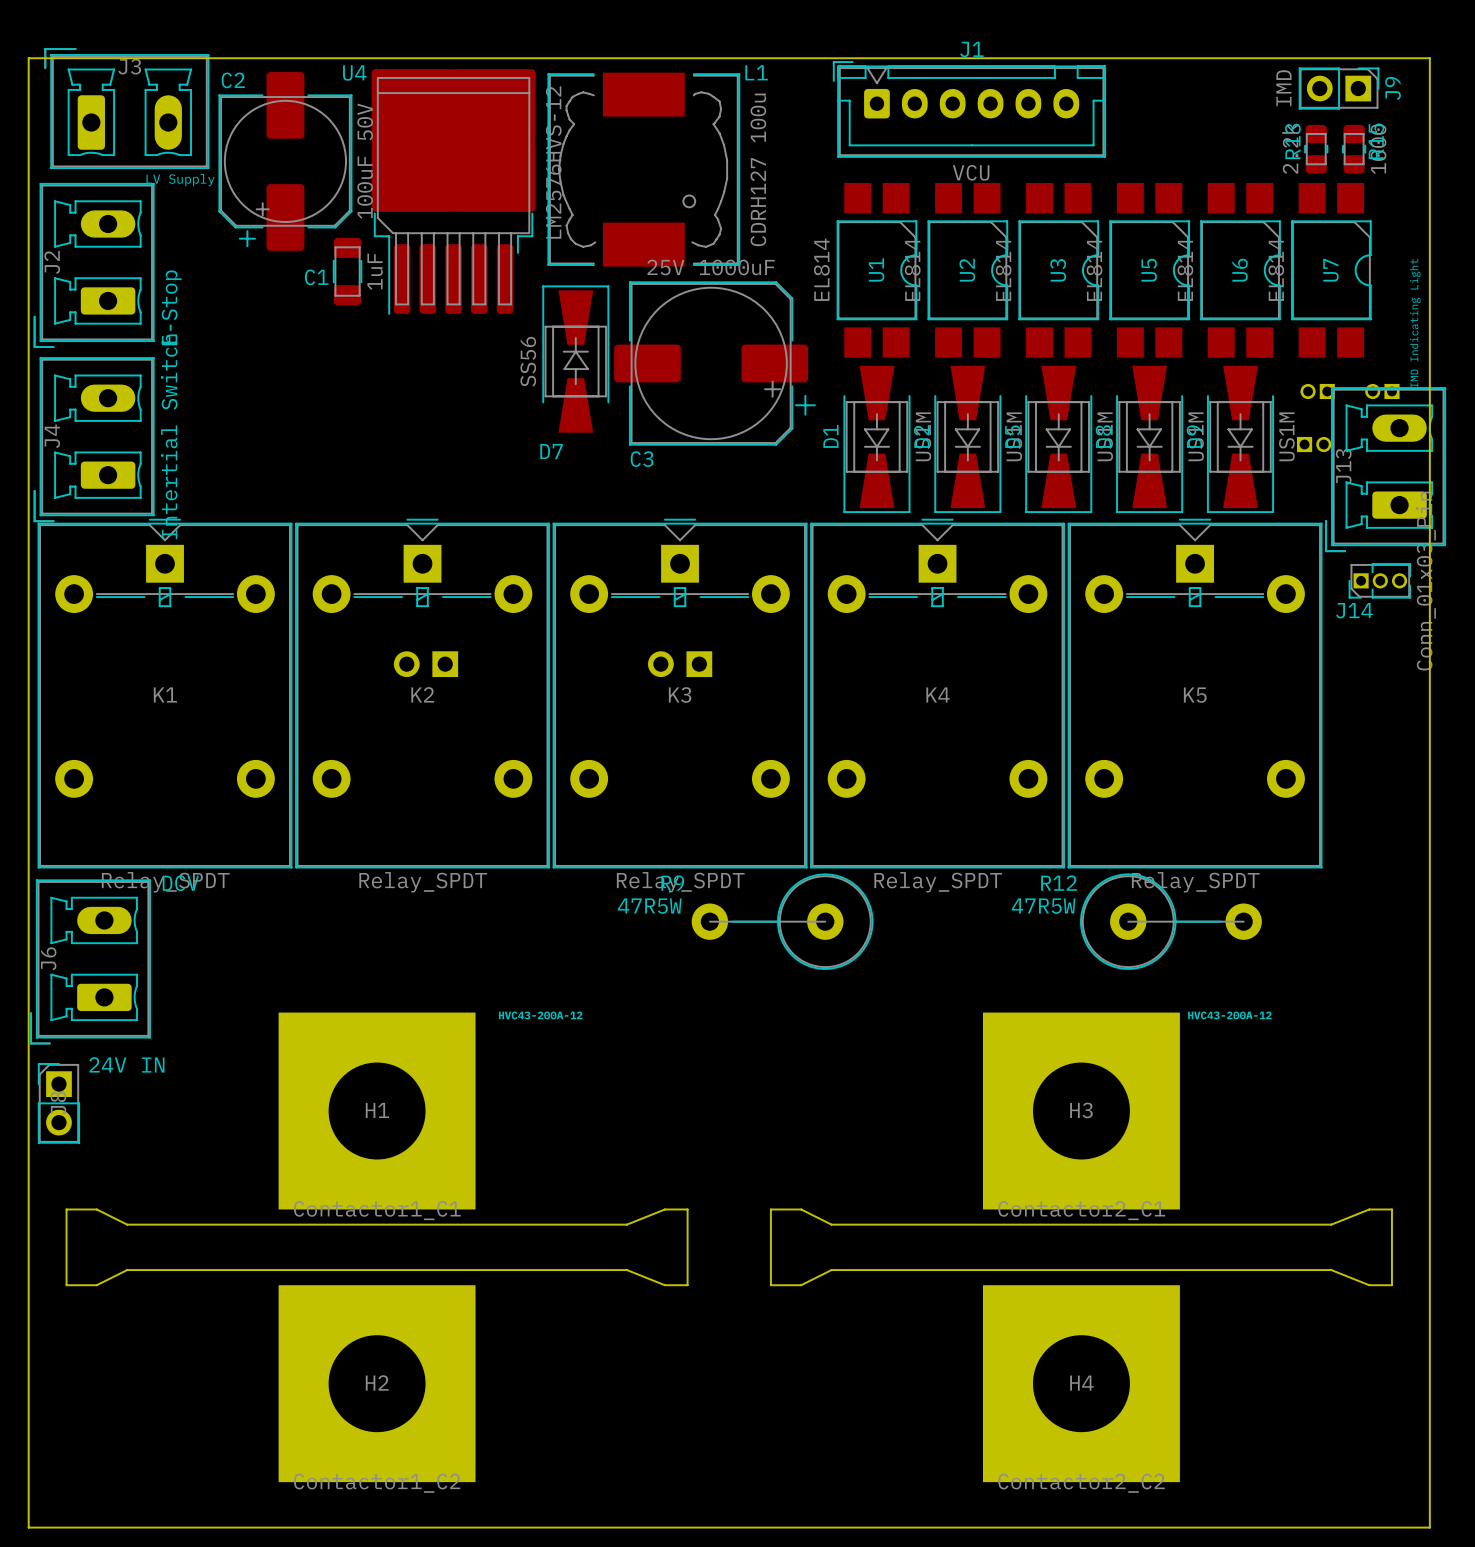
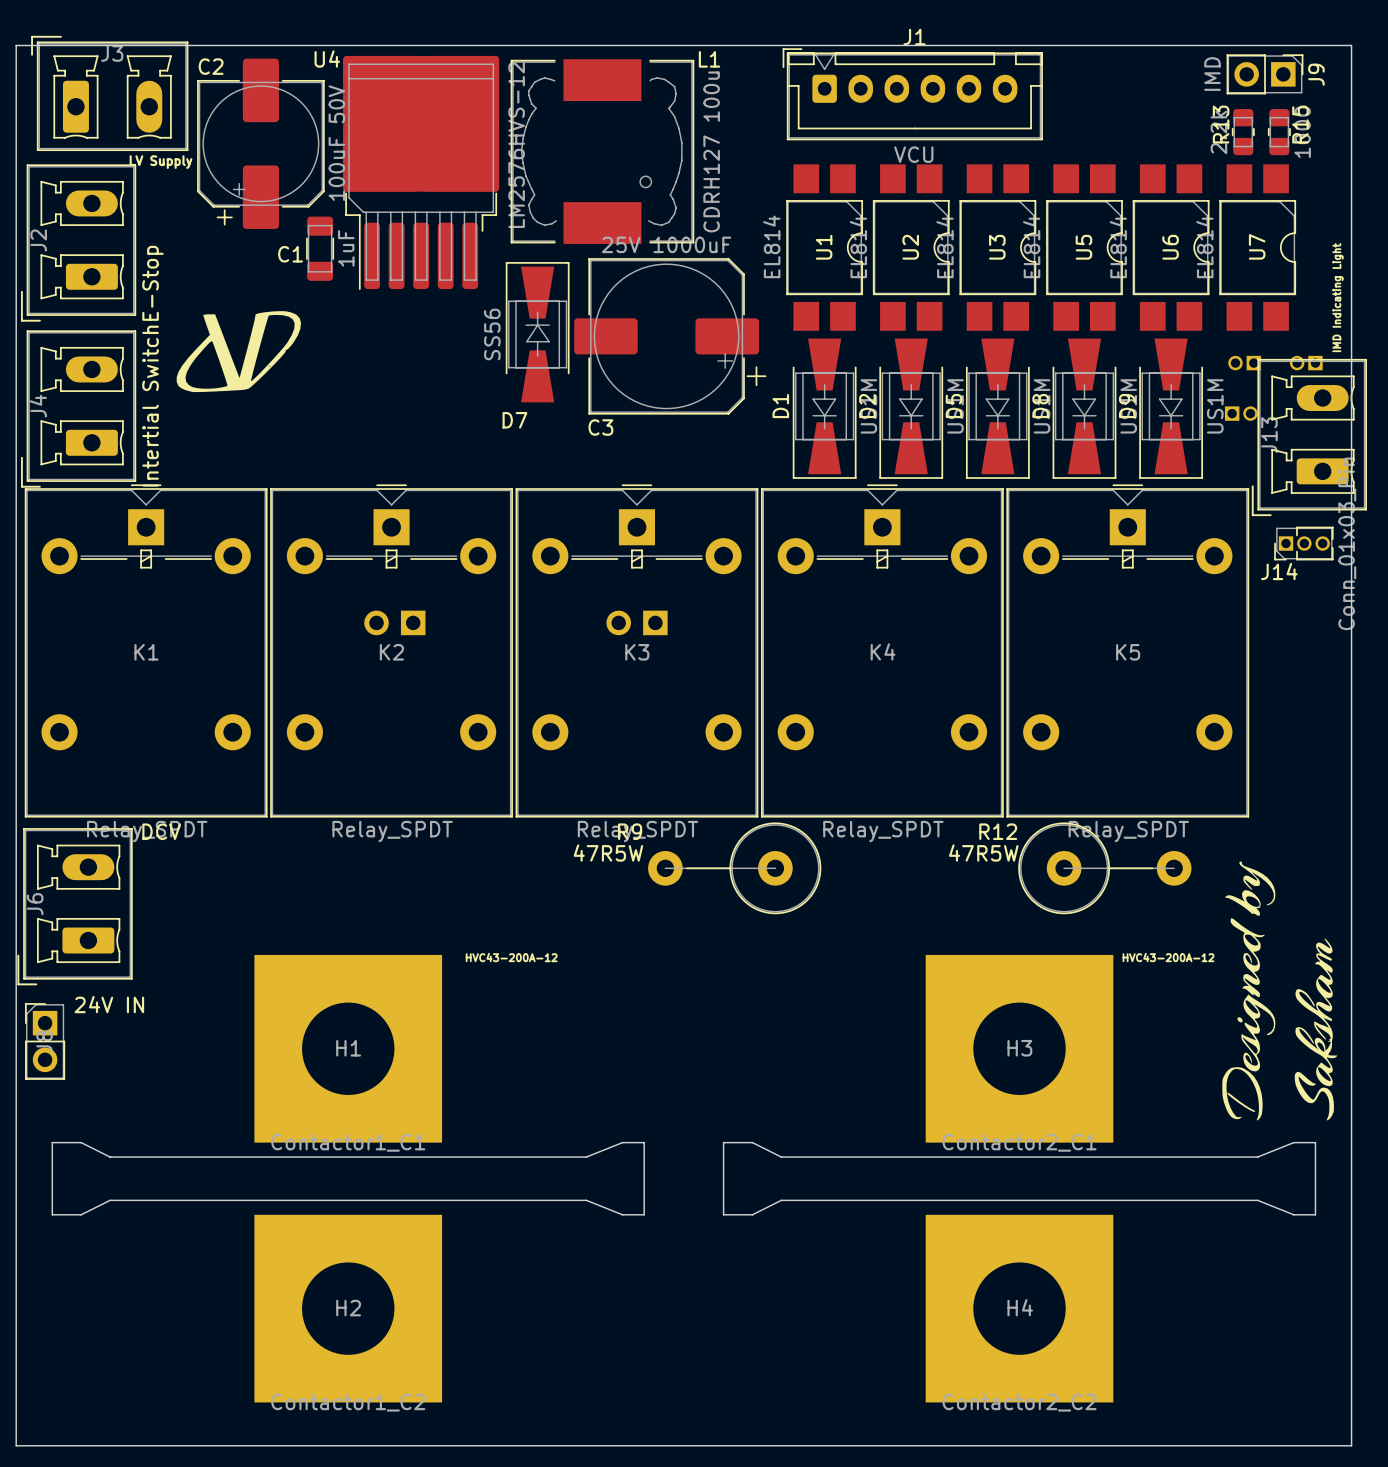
drawing: none -> [176, 311, 302, 393]
drawing: none -> [1222, 861, 1338, 1121]

